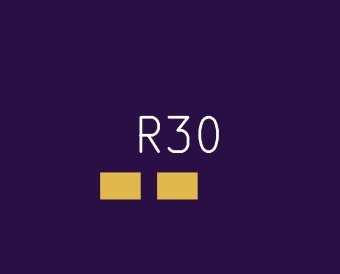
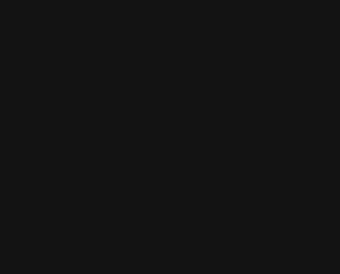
R30: (148, 185) -> none

